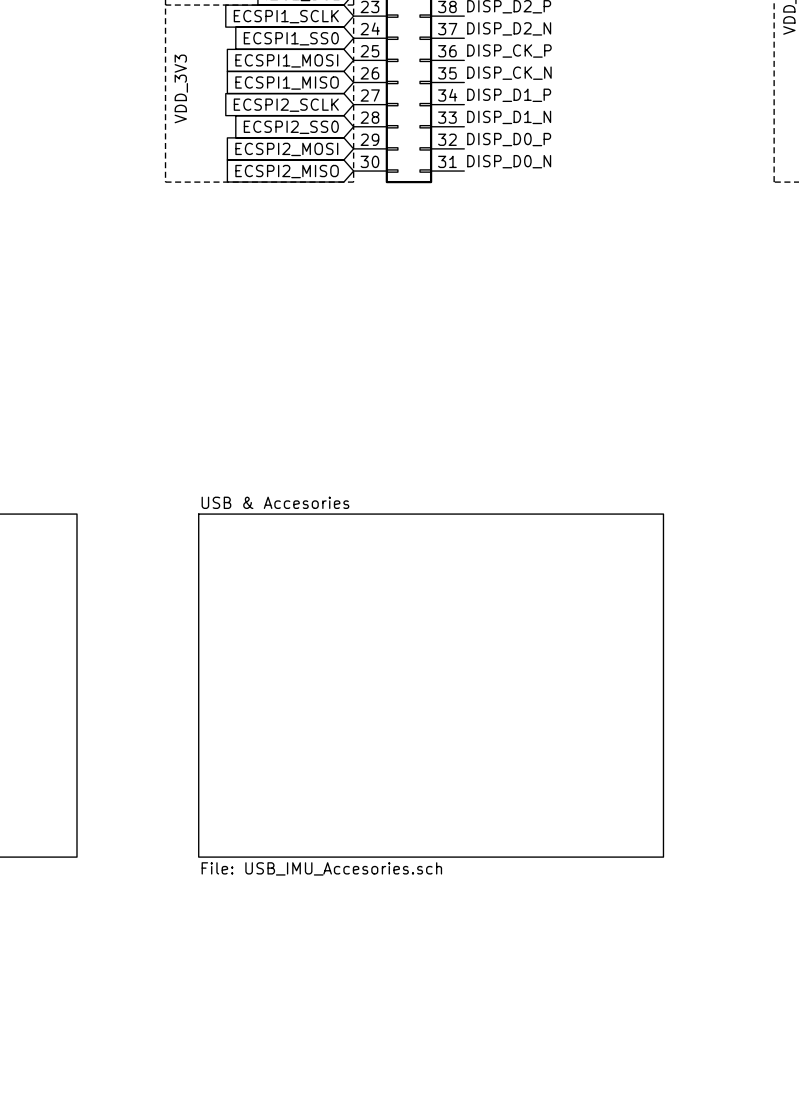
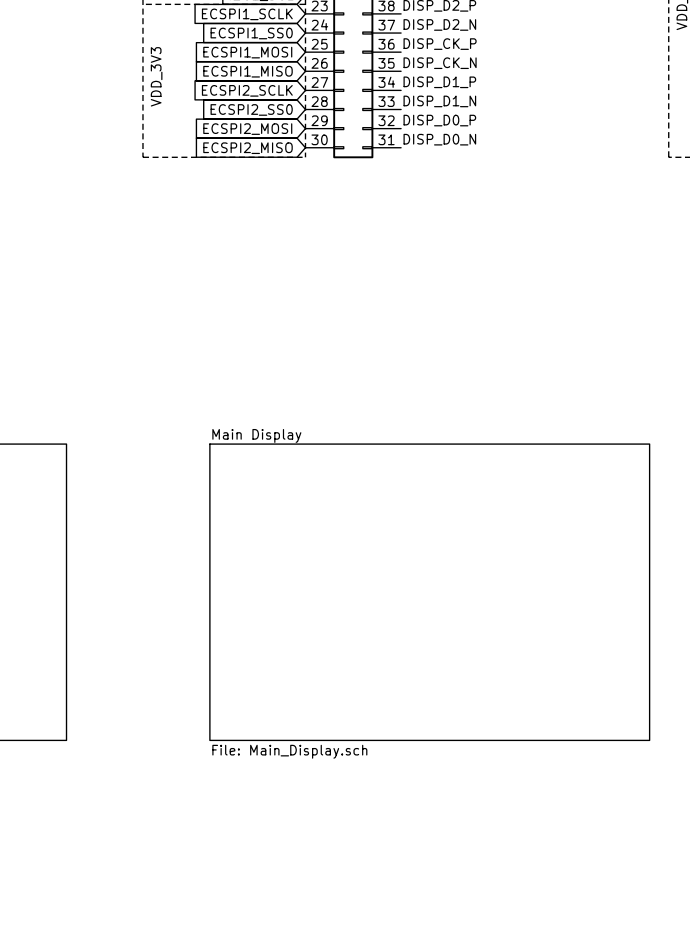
sheet USB & Accesories: File: USB_IMU_Accesories.sch (431, 685) -> none
sheet Main Display: none -> File: Main_Display.sch (429, 592)

